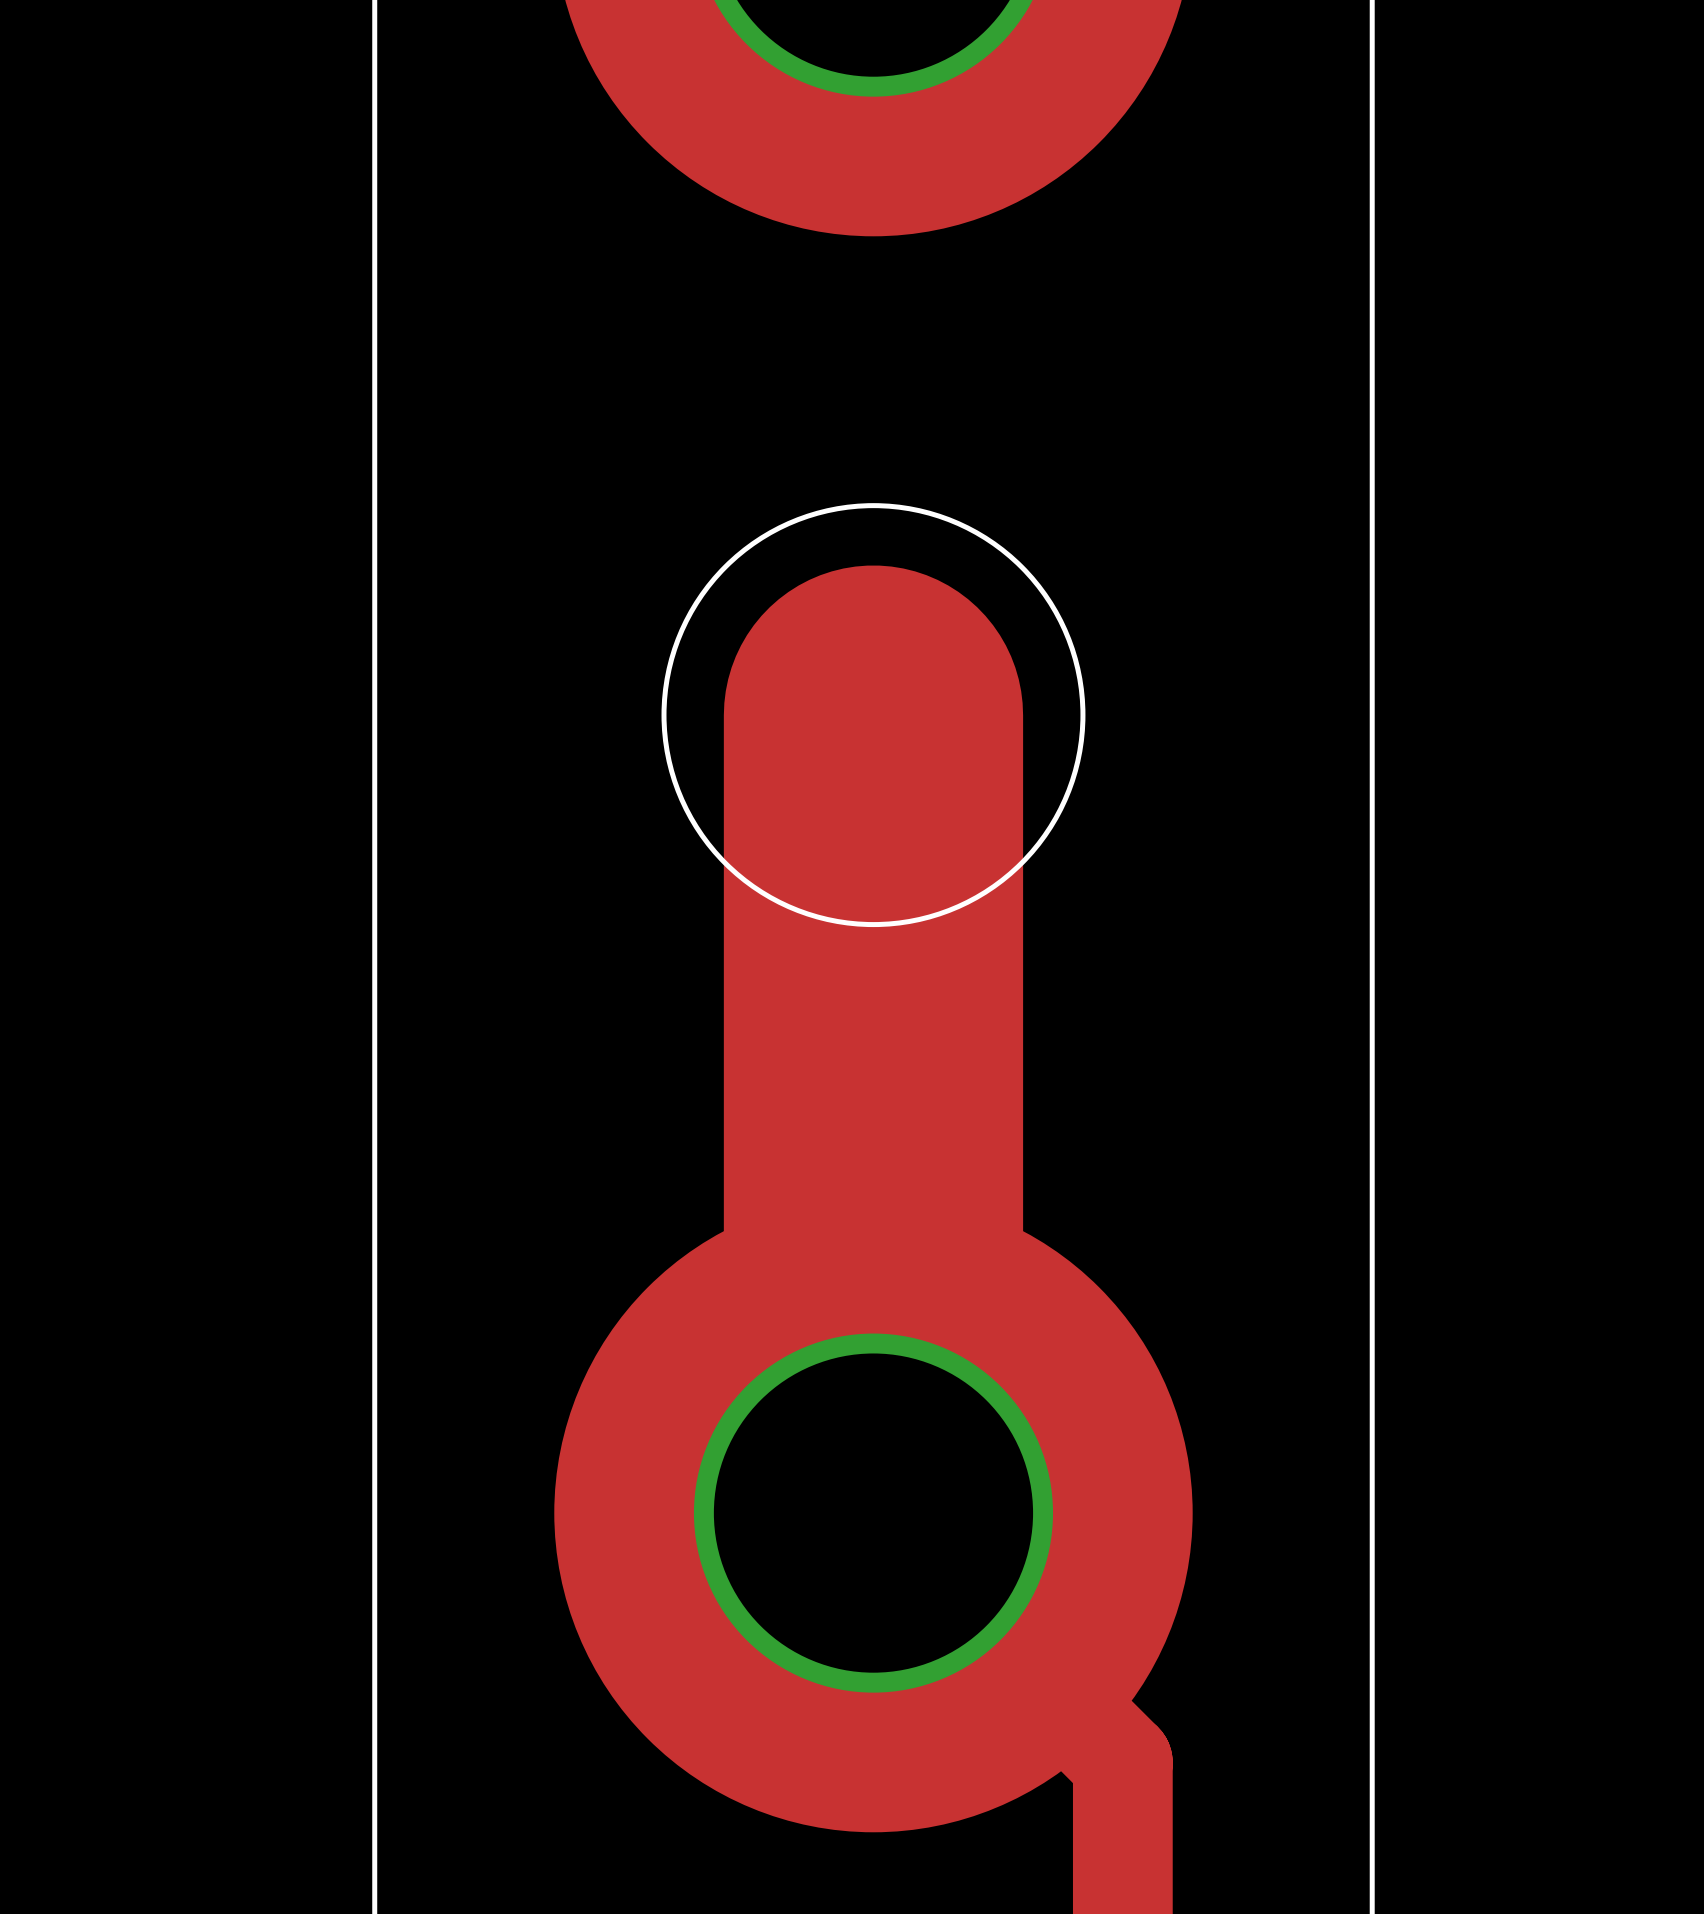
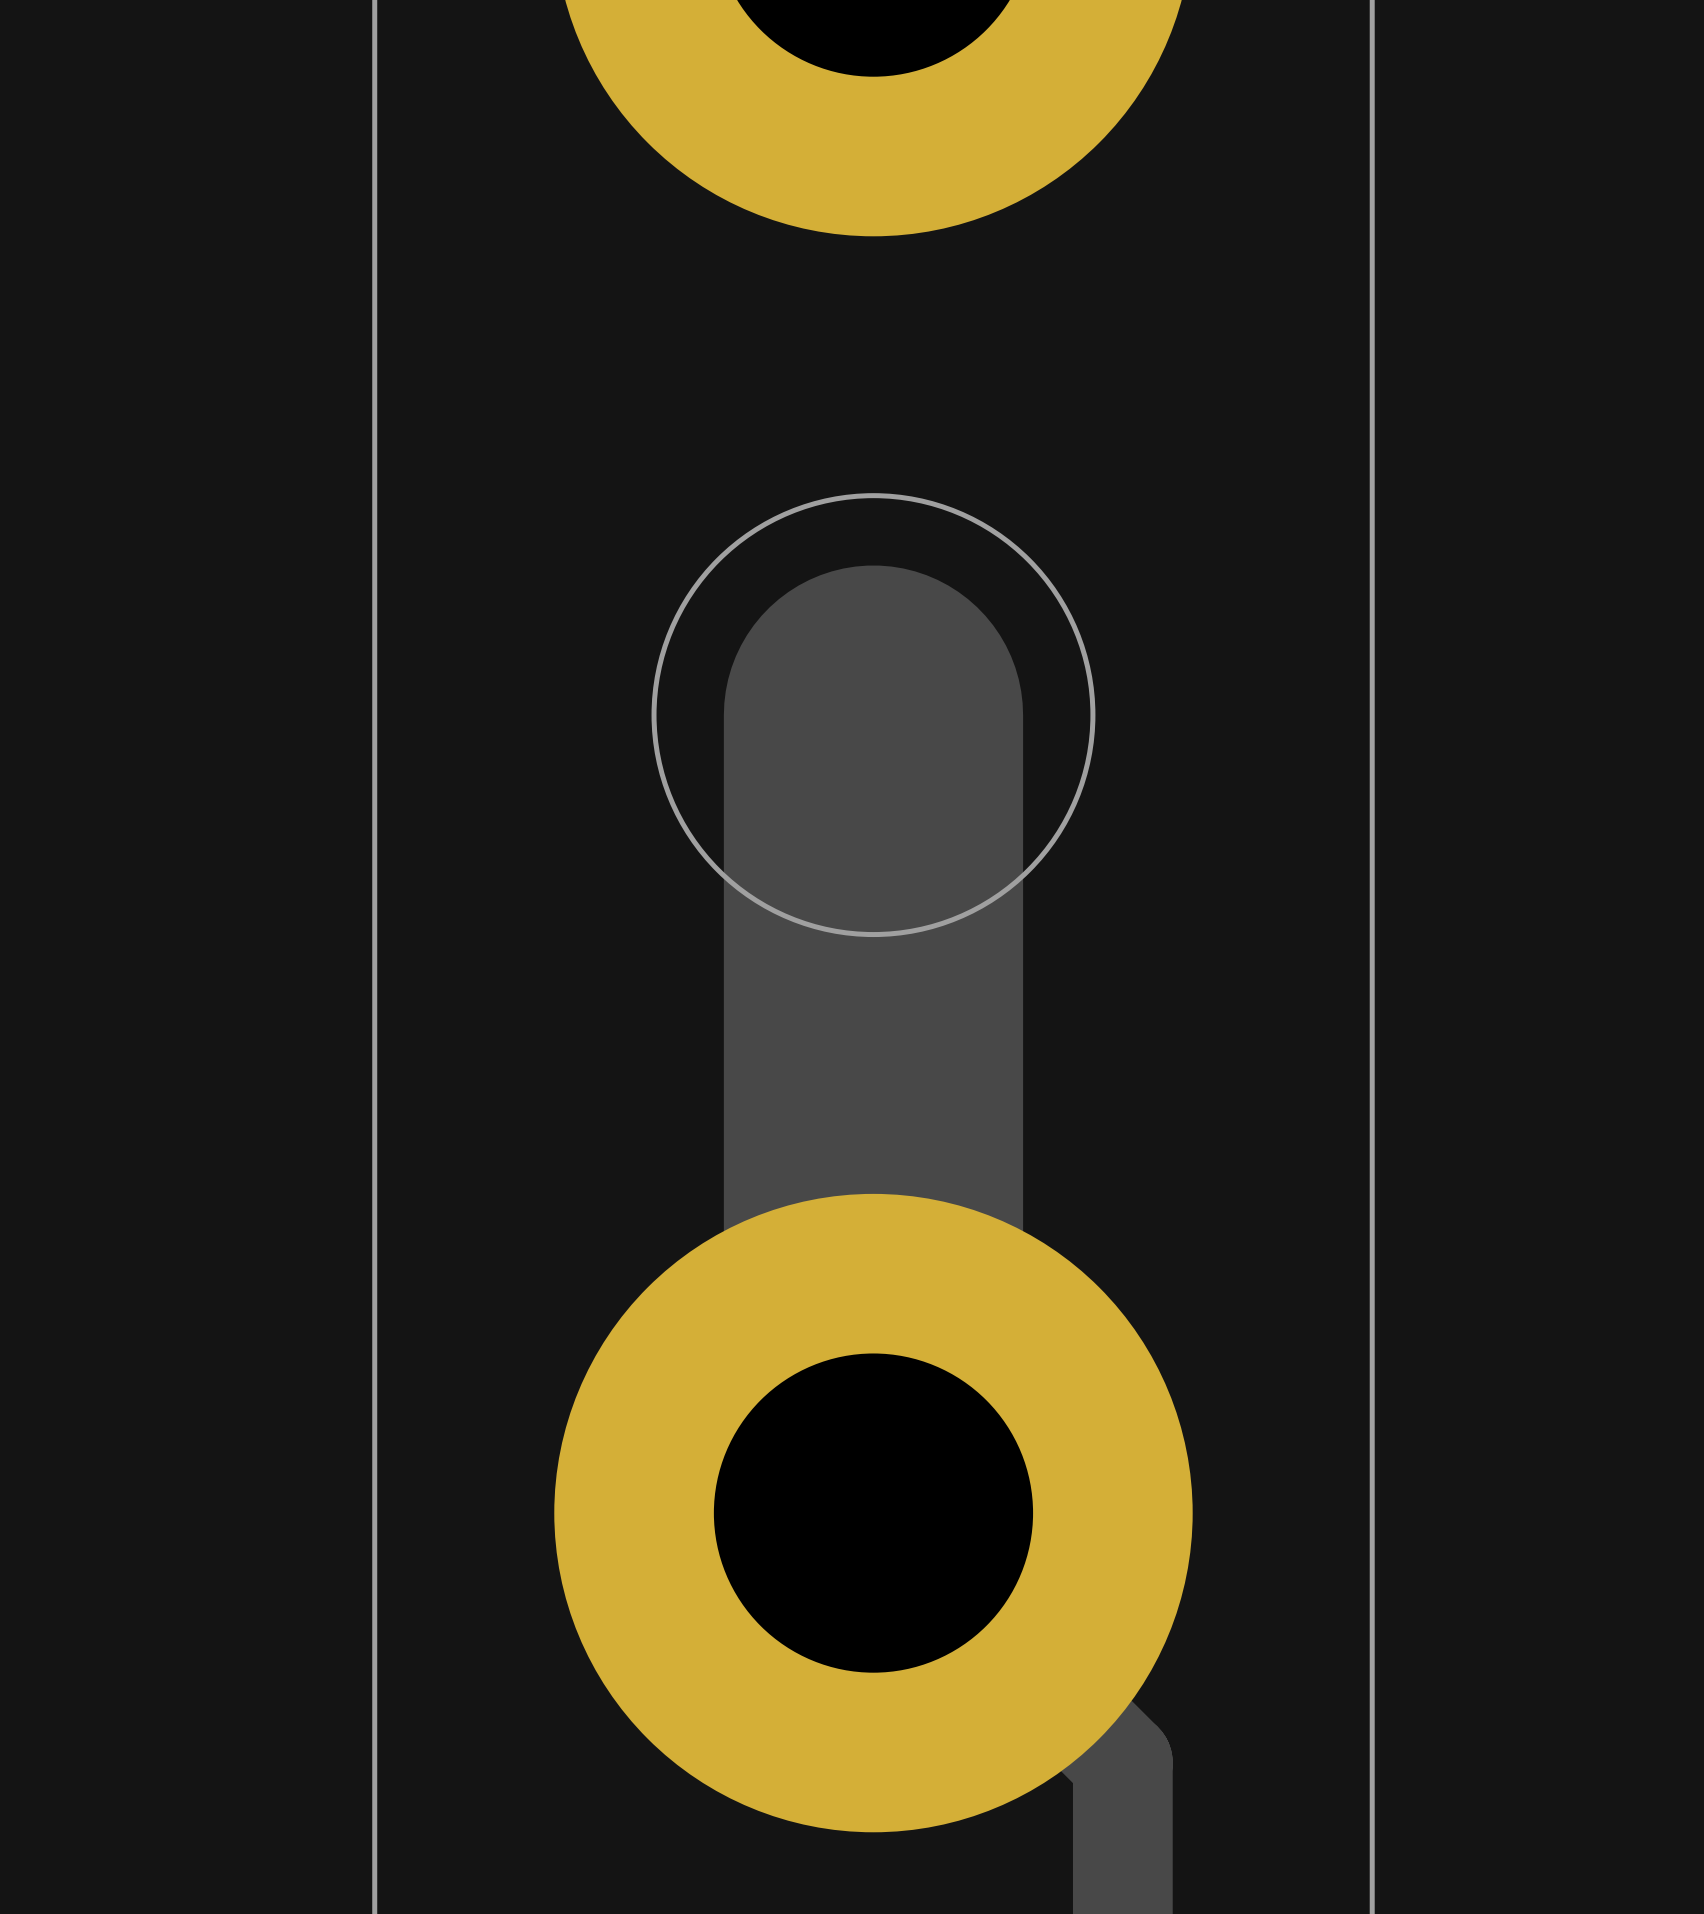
round board edge size: [661, 503, 1086, 928] -> [651, 493, 1096, 938]

